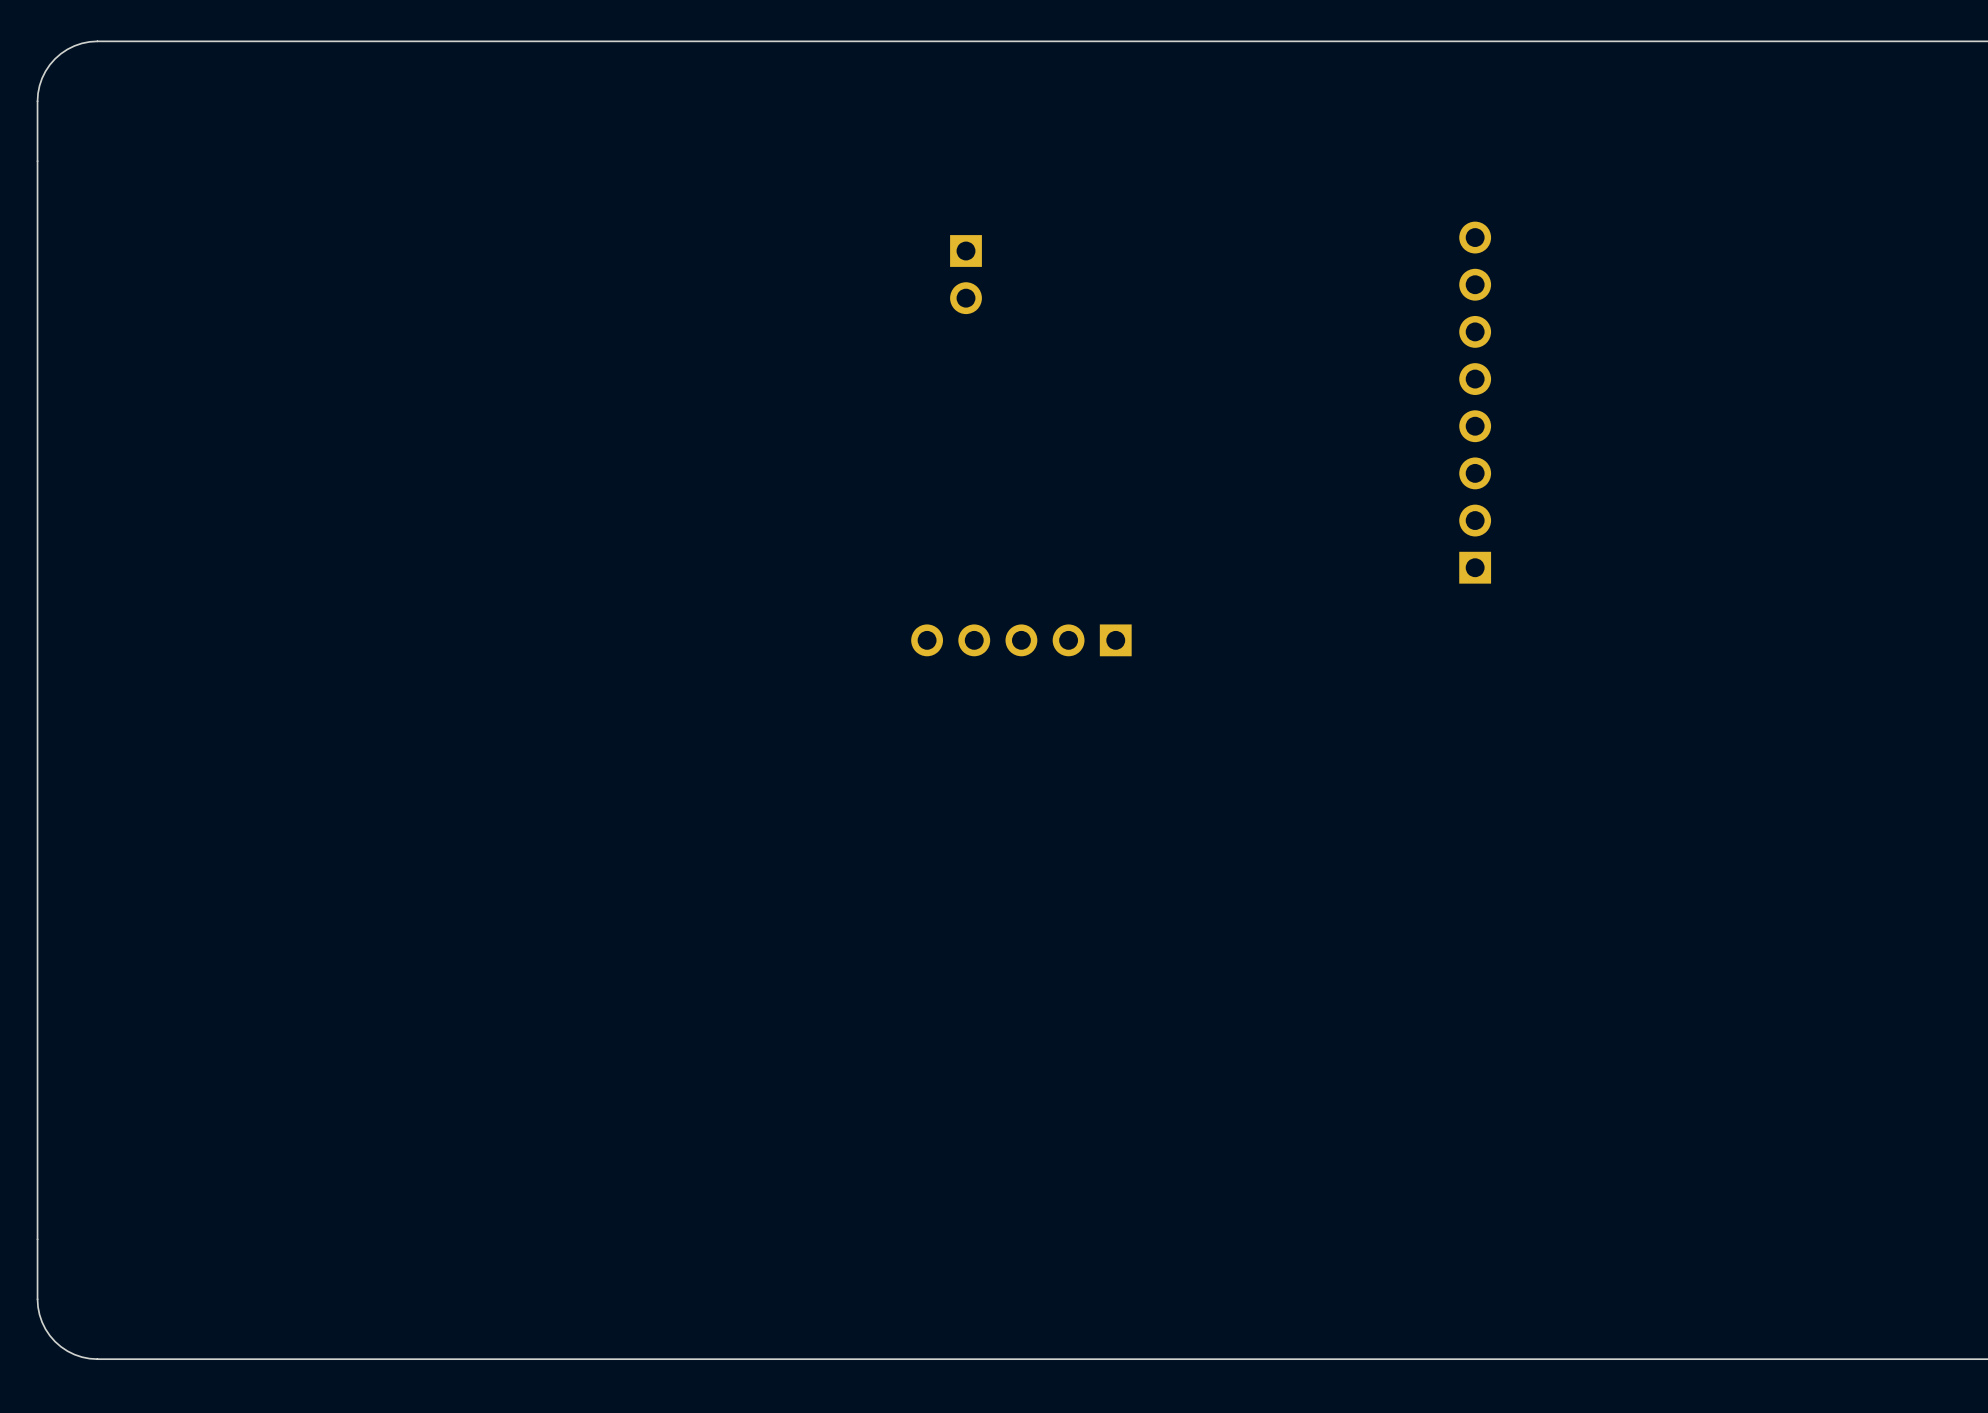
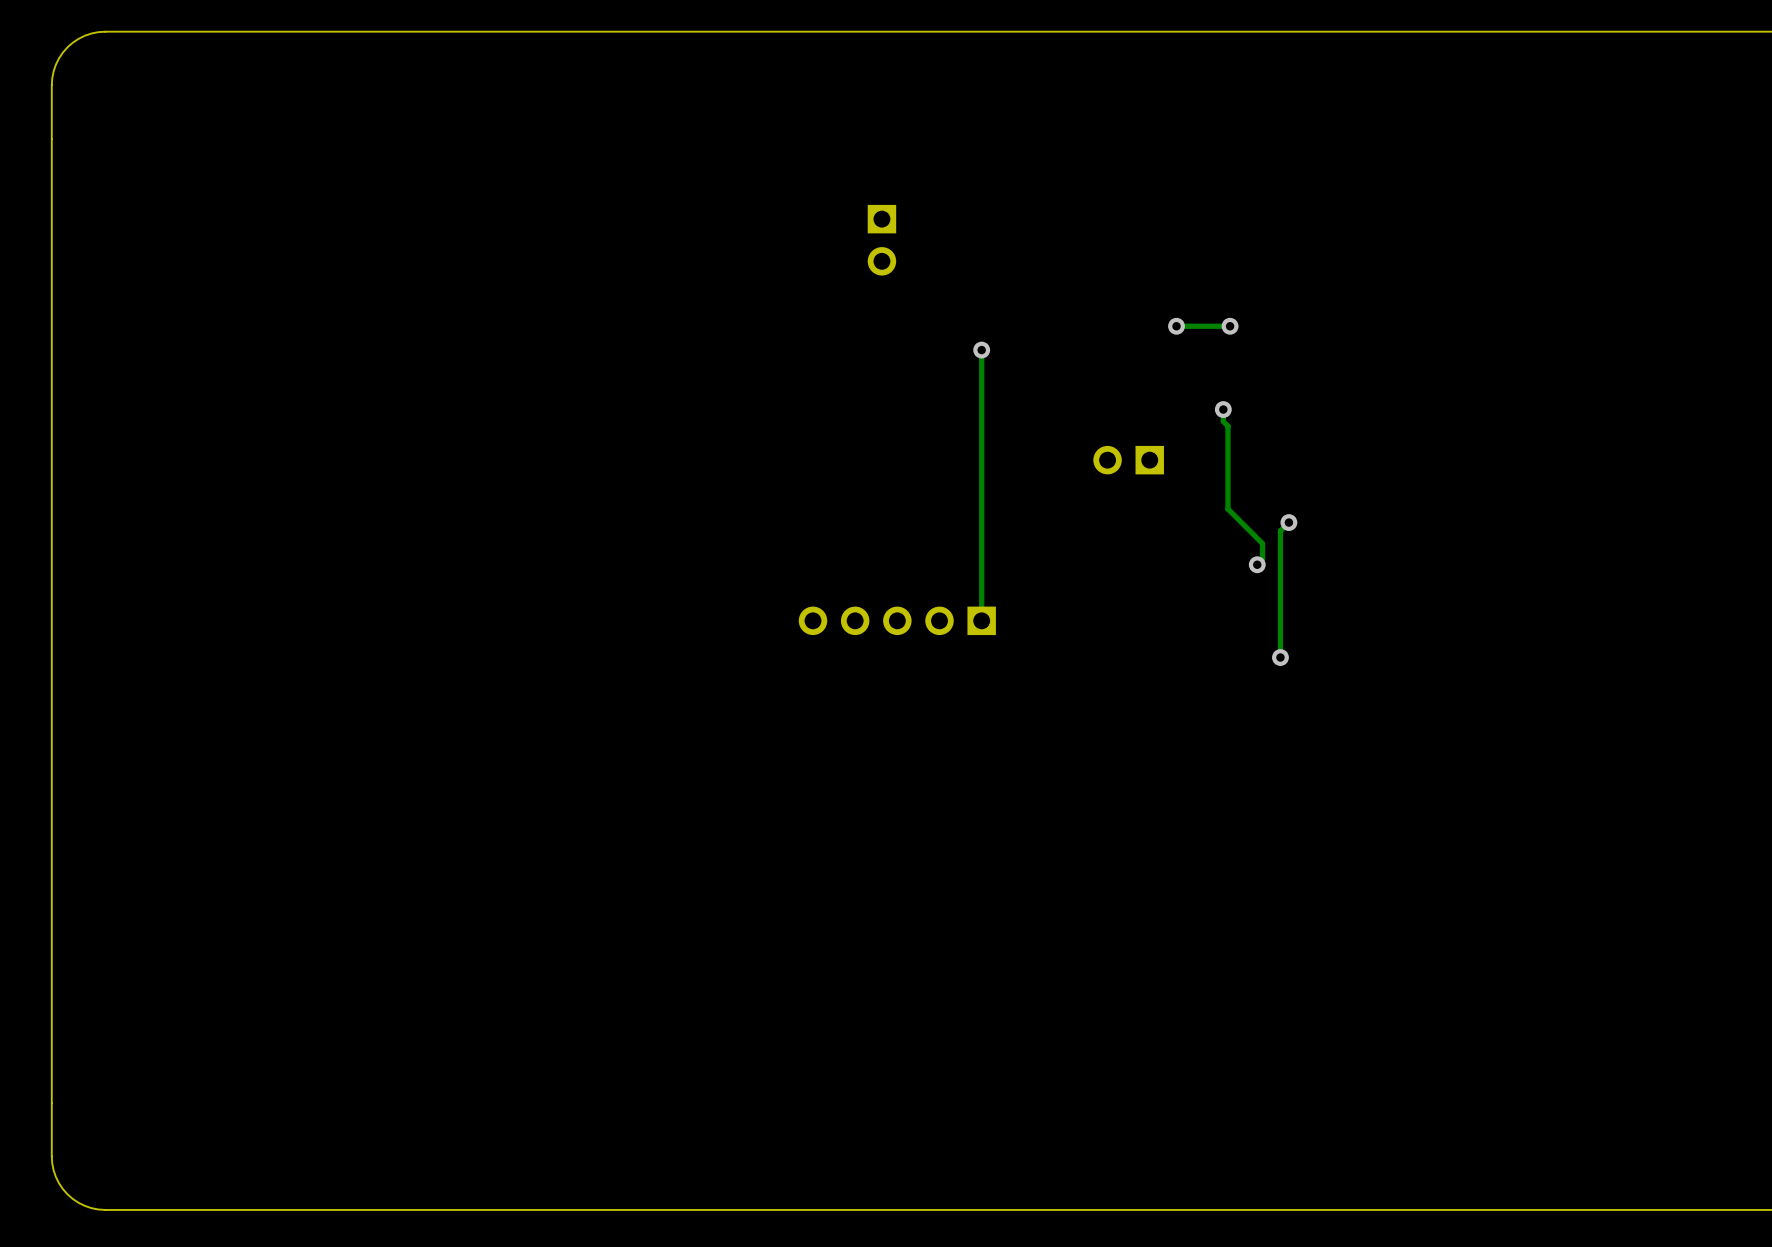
via: none -> (1176, 326)
track: none -> (1230, 326) (1176, 326)
via: none -> (1230, 326)
track: none -> (981, 350) (981, 620)
via: none -> (981, 350)
part: (1475, 402) -> none
track: none -> (1223, 409) (1223, 421) (1227, 426) (1227, 509) (1262, 543) (1262, 559) (1257, 564)
via: none -> (1223, 409)
part: none -> (1128, 460)
track: none -> (1288, 522) (1280, 531) (1280, 657)
via: none -> (1288, 522)
via: none -> (1257, 564)
part position: (1021, 640) -> (897, 620)
via: none -> (1280, 657)

